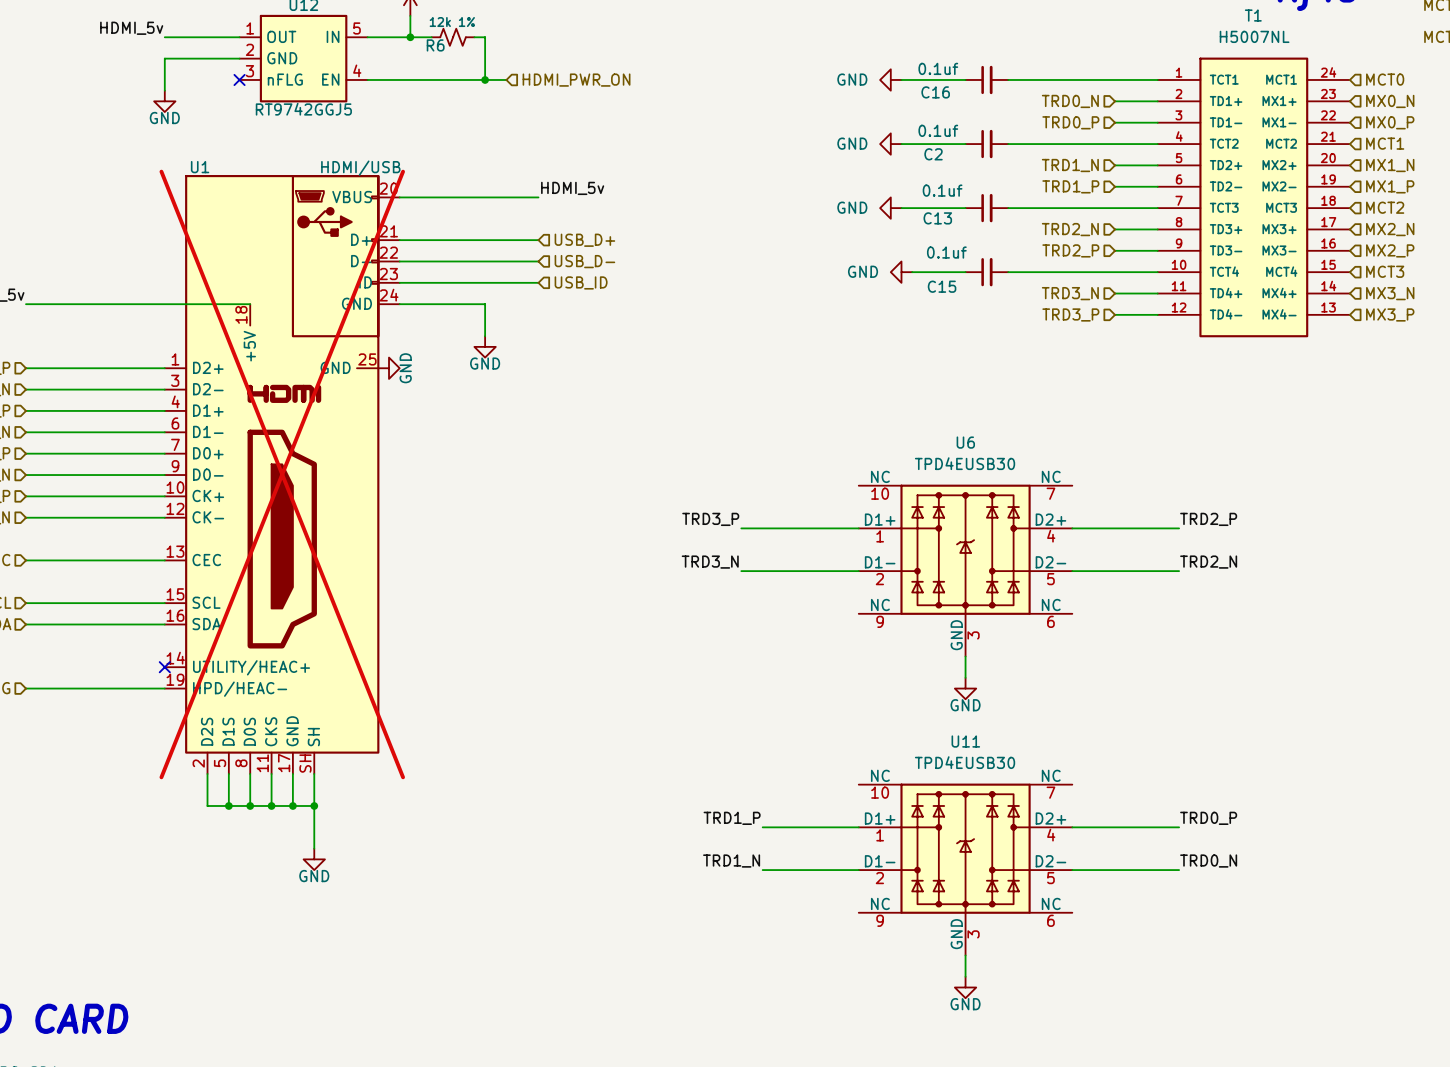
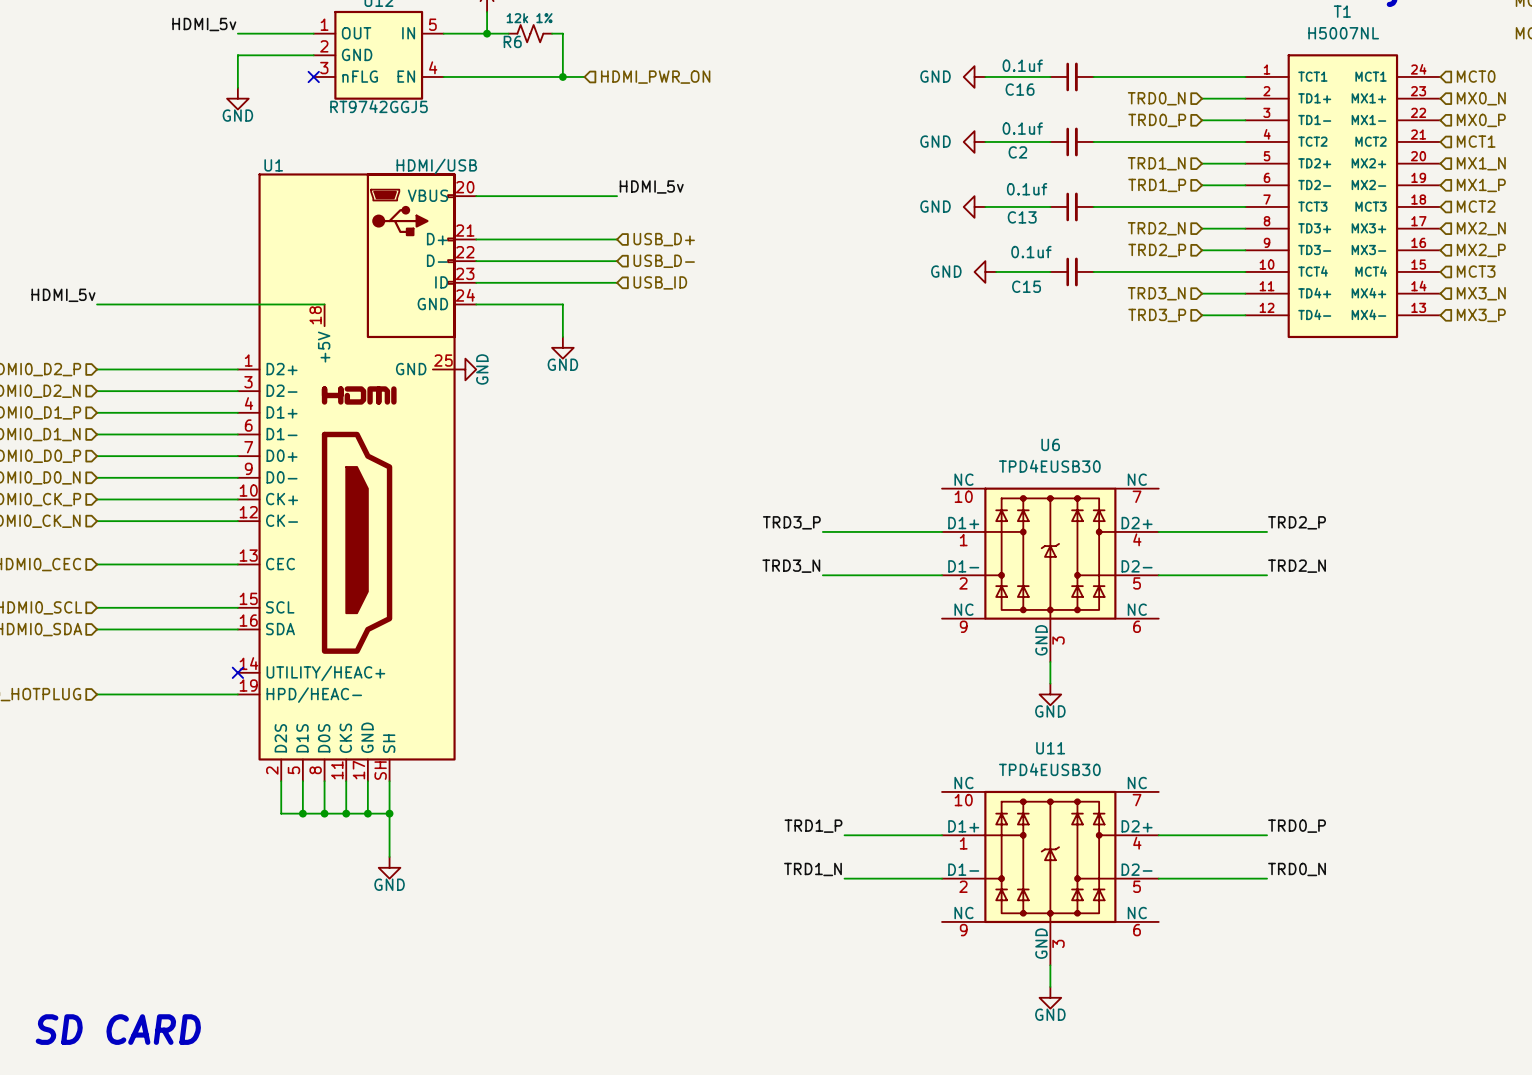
U1 do-not-place cross: (282, 474) -> none

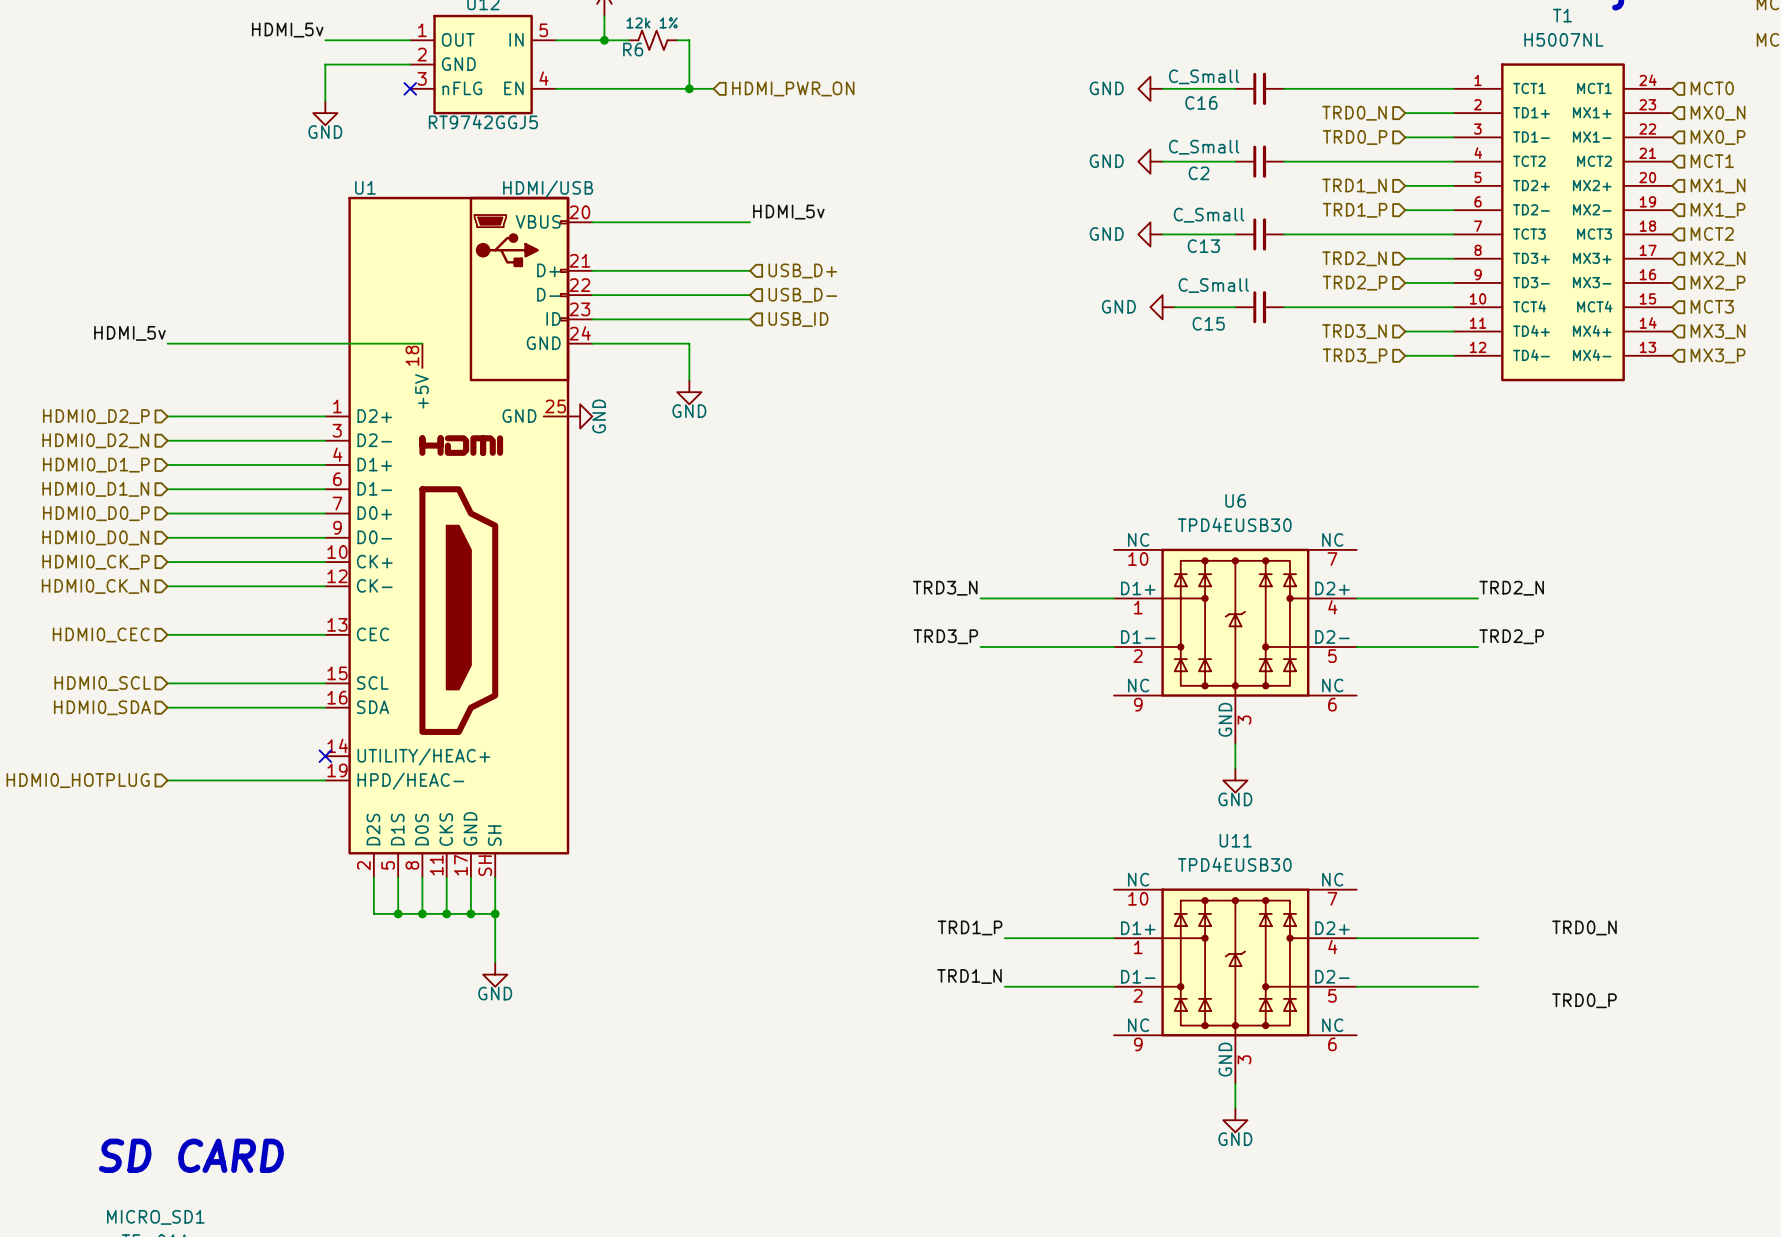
C16 value: 0.1uf (1022, 65) -> C_Small (1204, 76)
C2 value: 0.1uf (1022, 128) -> C_Small (1204, 147)
C13 value: 0.1uf (1027, 189) -> C_Small (1208, 215)
C15 value: 0.1uf (1031, 252) -> C_Small (1213, 285)
label: TRD3_P (791, 522) -> TRD3_N (945, 588)
label: TRD2_P (1297, 522) -> TRD2_N (1511, 588)
label: TRD3_N (791, 566) -> TRD3_P (945, 636)
label: TRD2_N (1297, 566) -> TRD2_P (1511, 636)
label position: TRD0_P (1297, 826) -> TRD0_P (1584, 1000)
label position: TRD0_N (1297, 869) -> TRD0_N (1584, 927)

